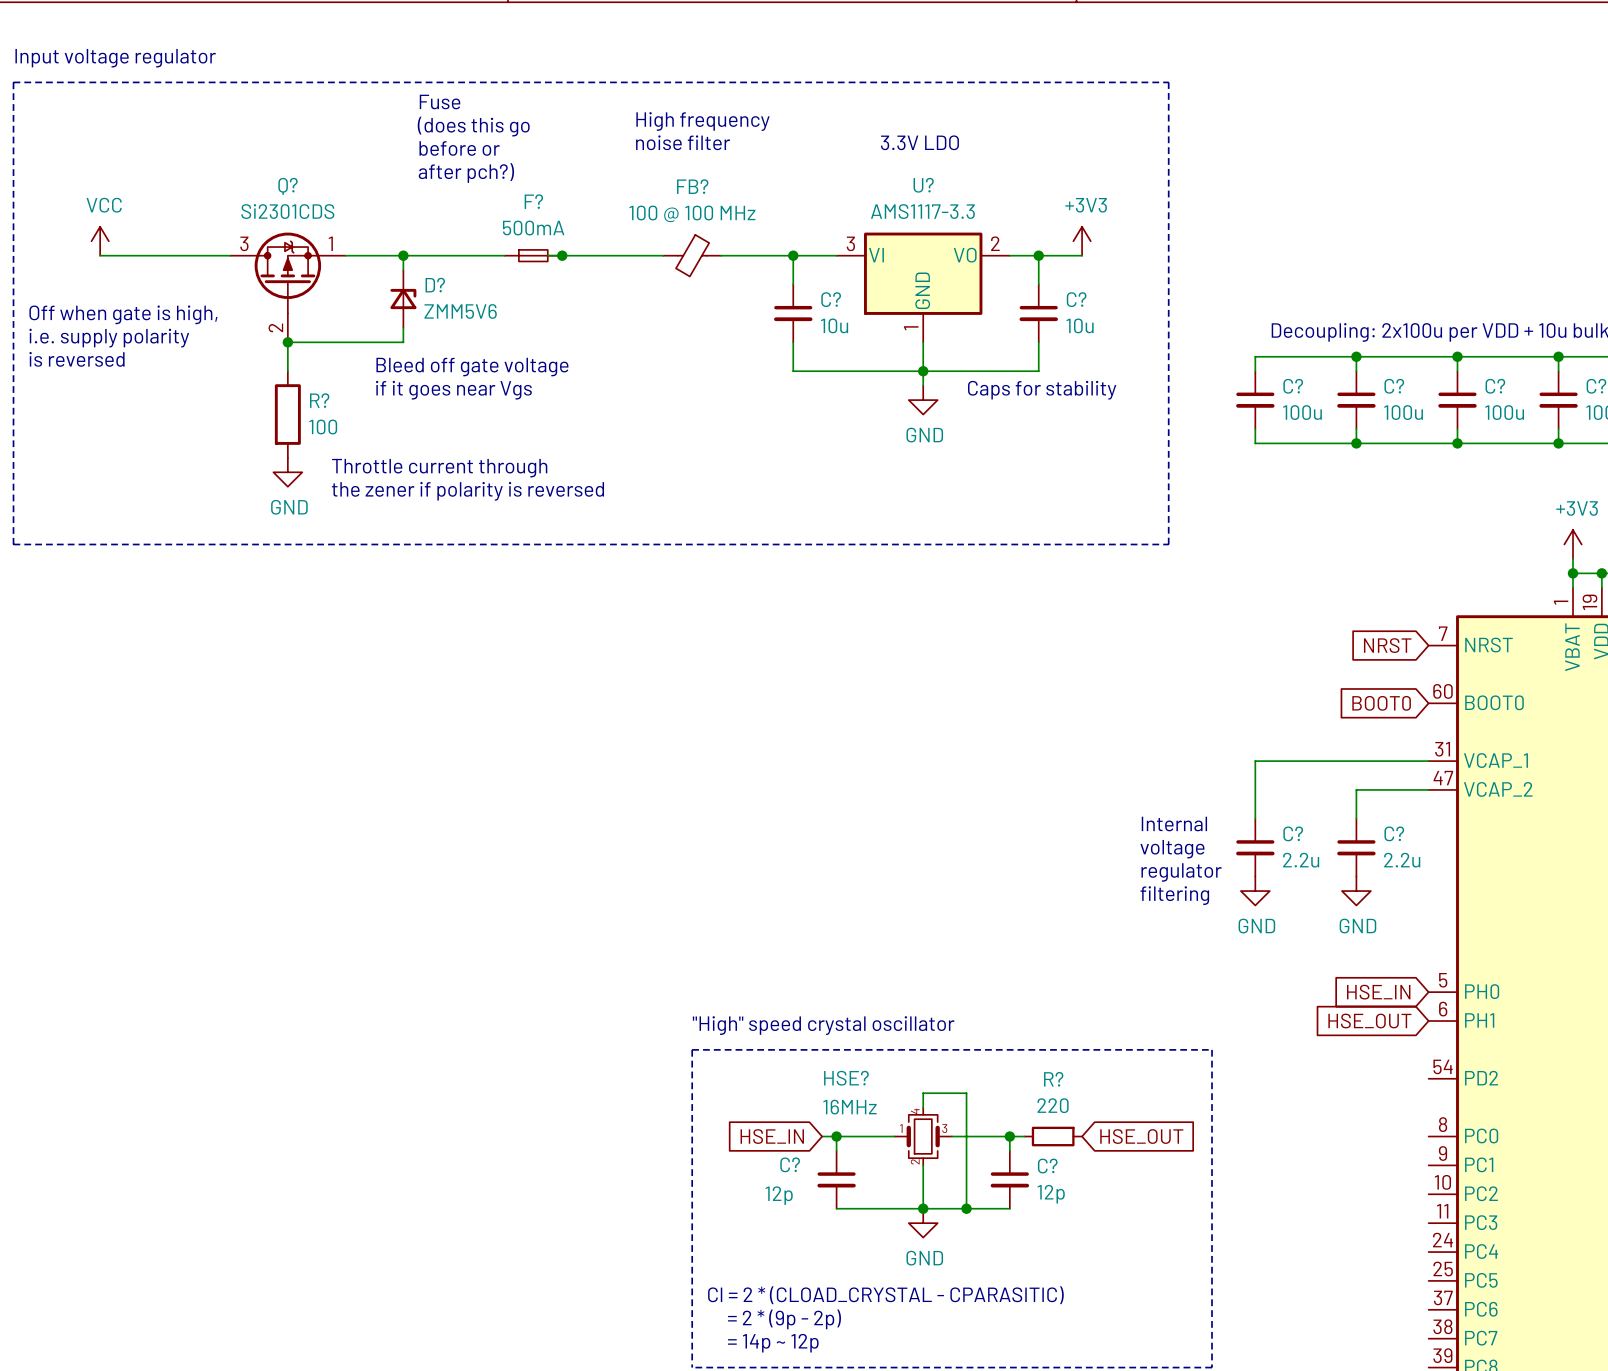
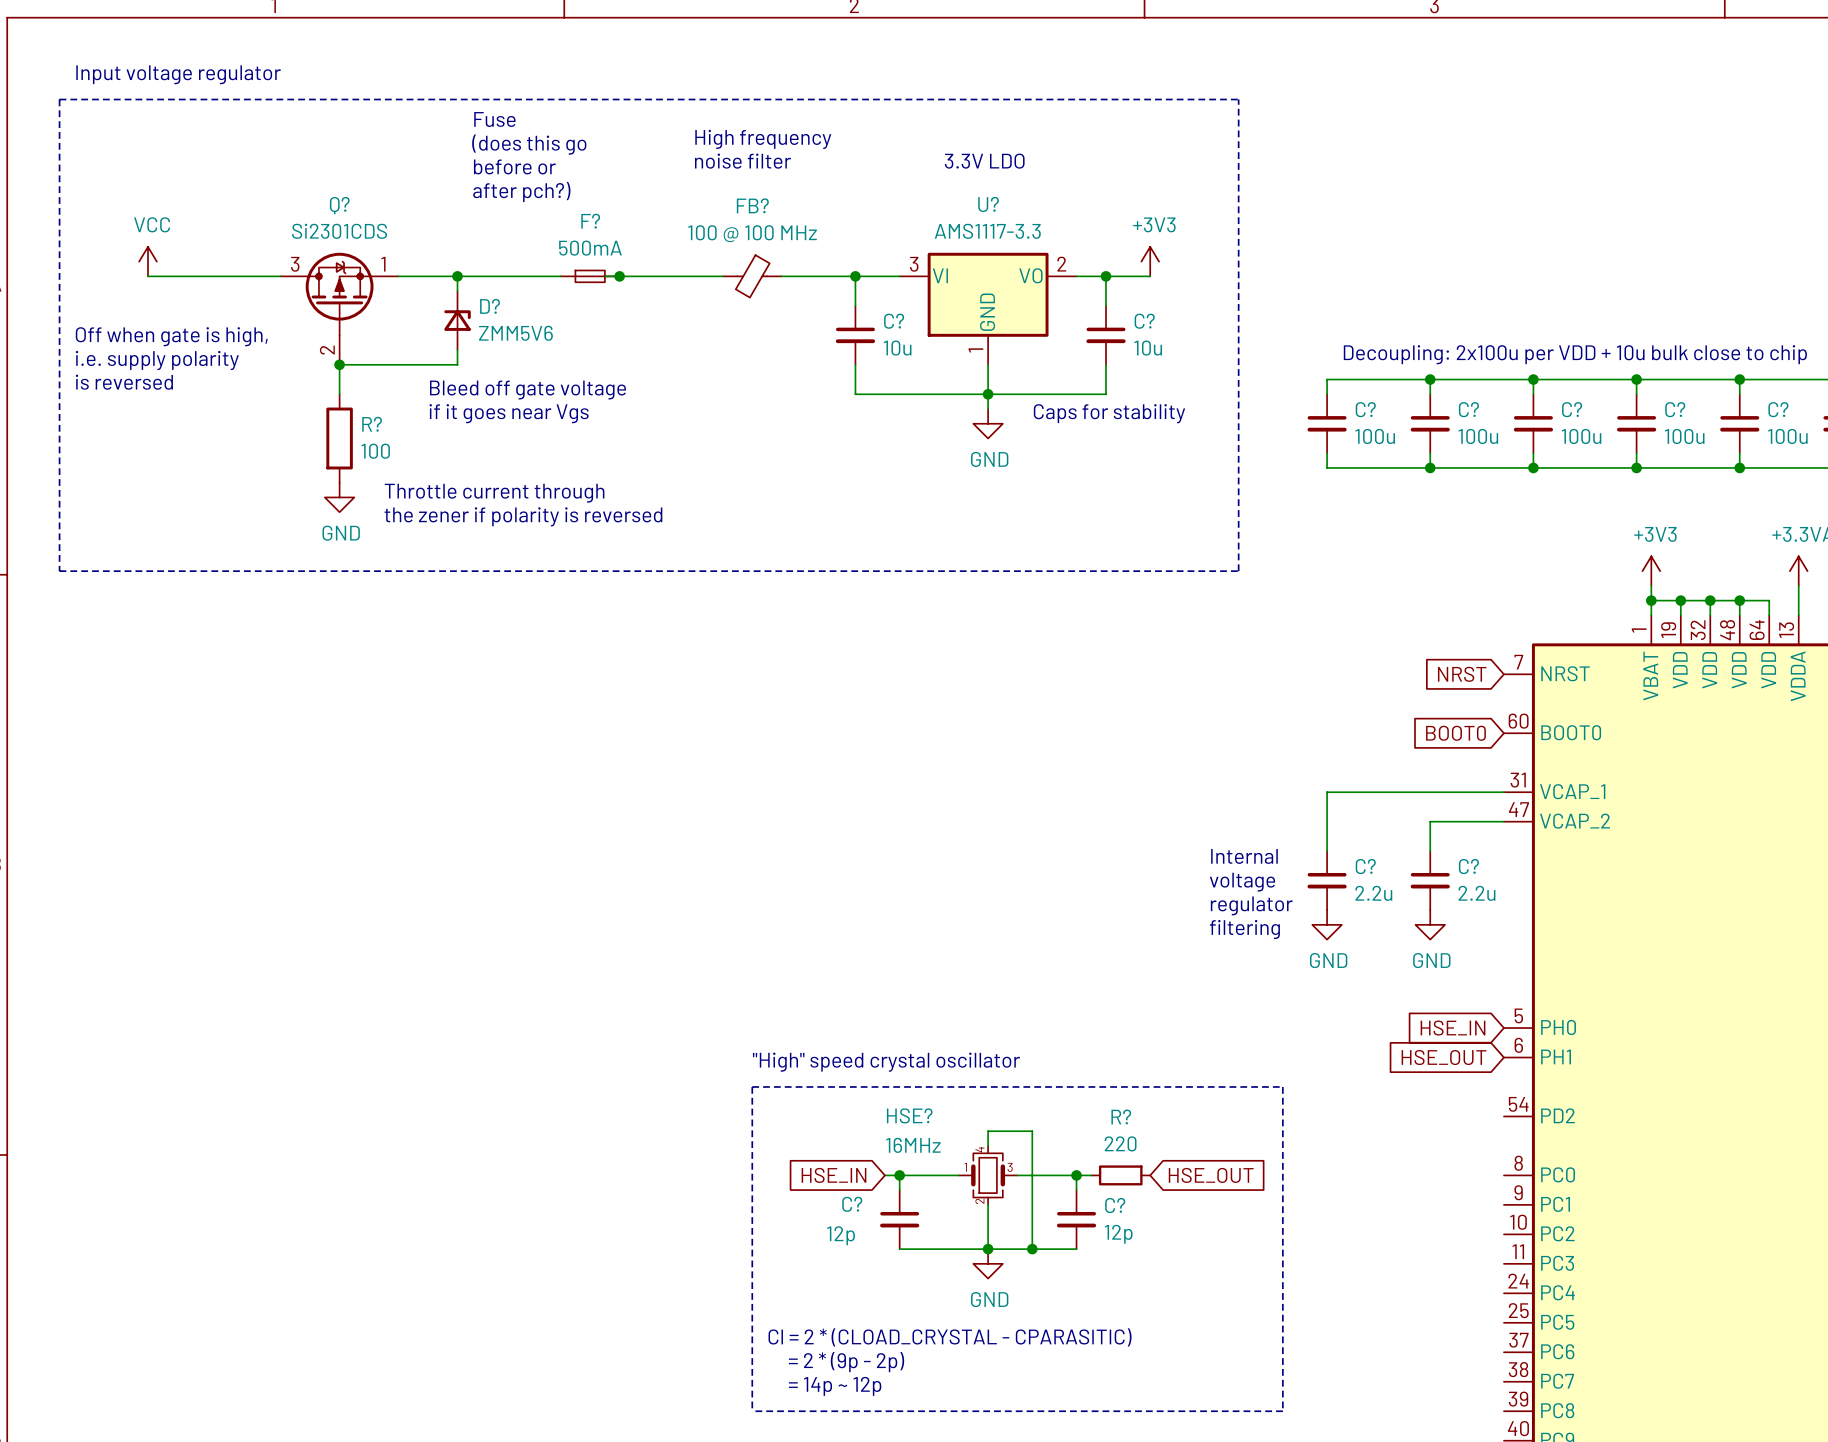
text position: Input voltage regulator (115, 58) -> Input voltage regulator (178, 74)

